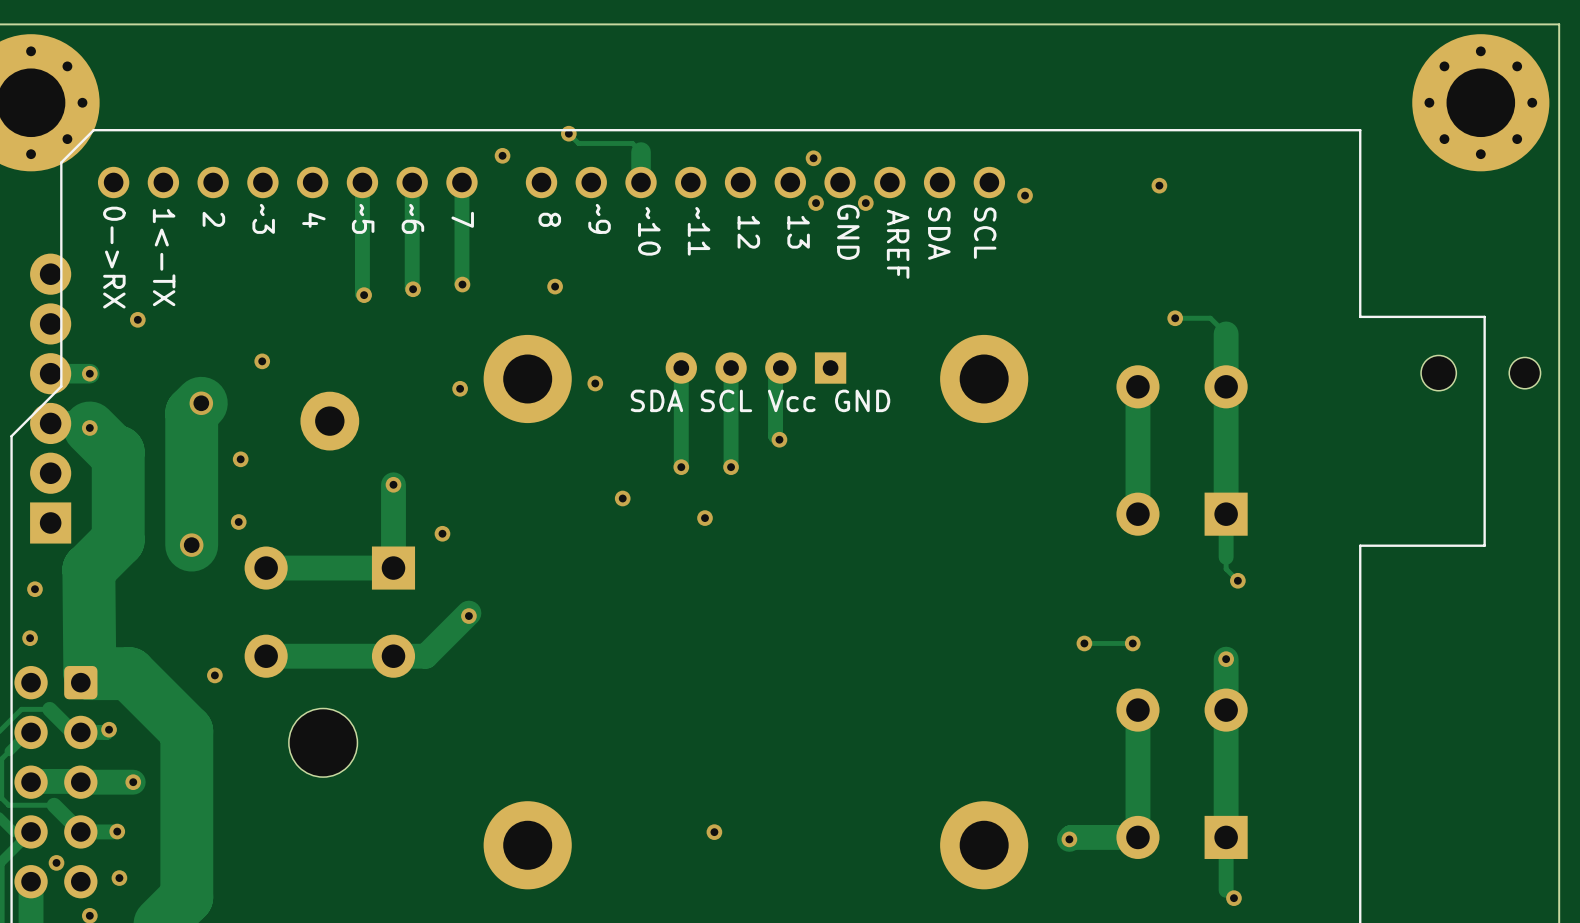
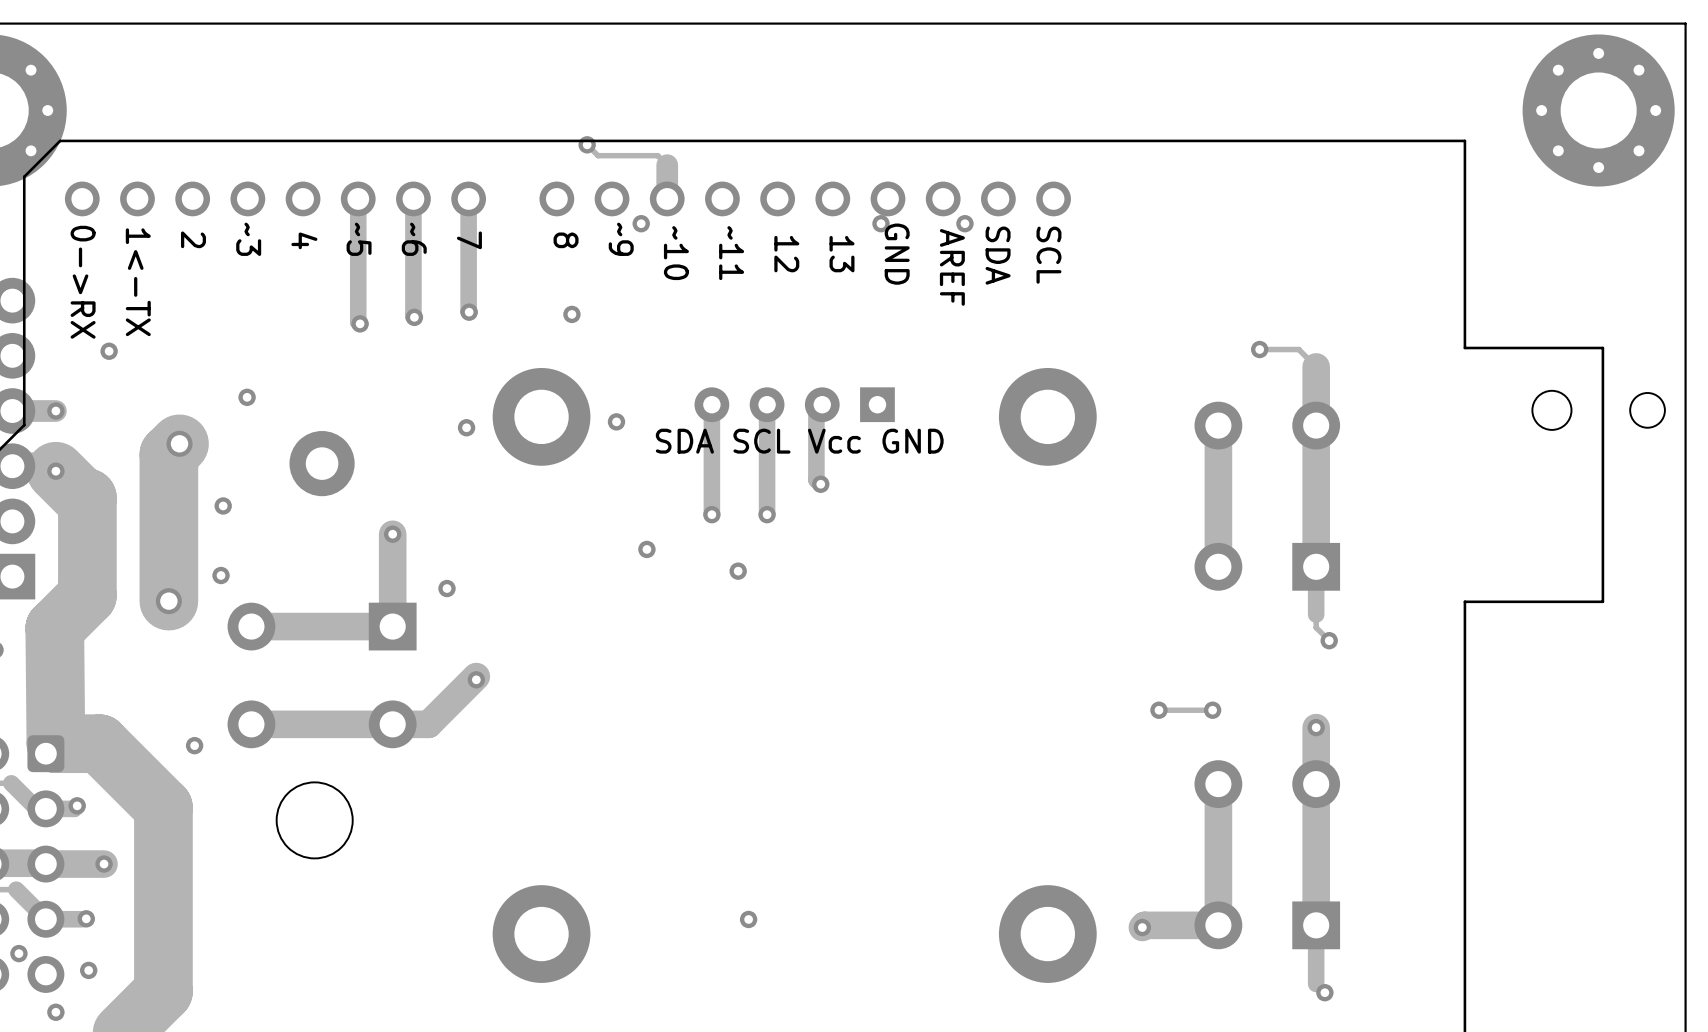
via: (502, 155) -> none
via: (813, 158) -> none
via: (1159, 185) -> none
via: (1025, 195) -> none
via: (816, 203) -> none
via: (865, 203) -> none
via: none -> (641, 223)
via: none -> (881, 223)
via: none -> (964, 223)

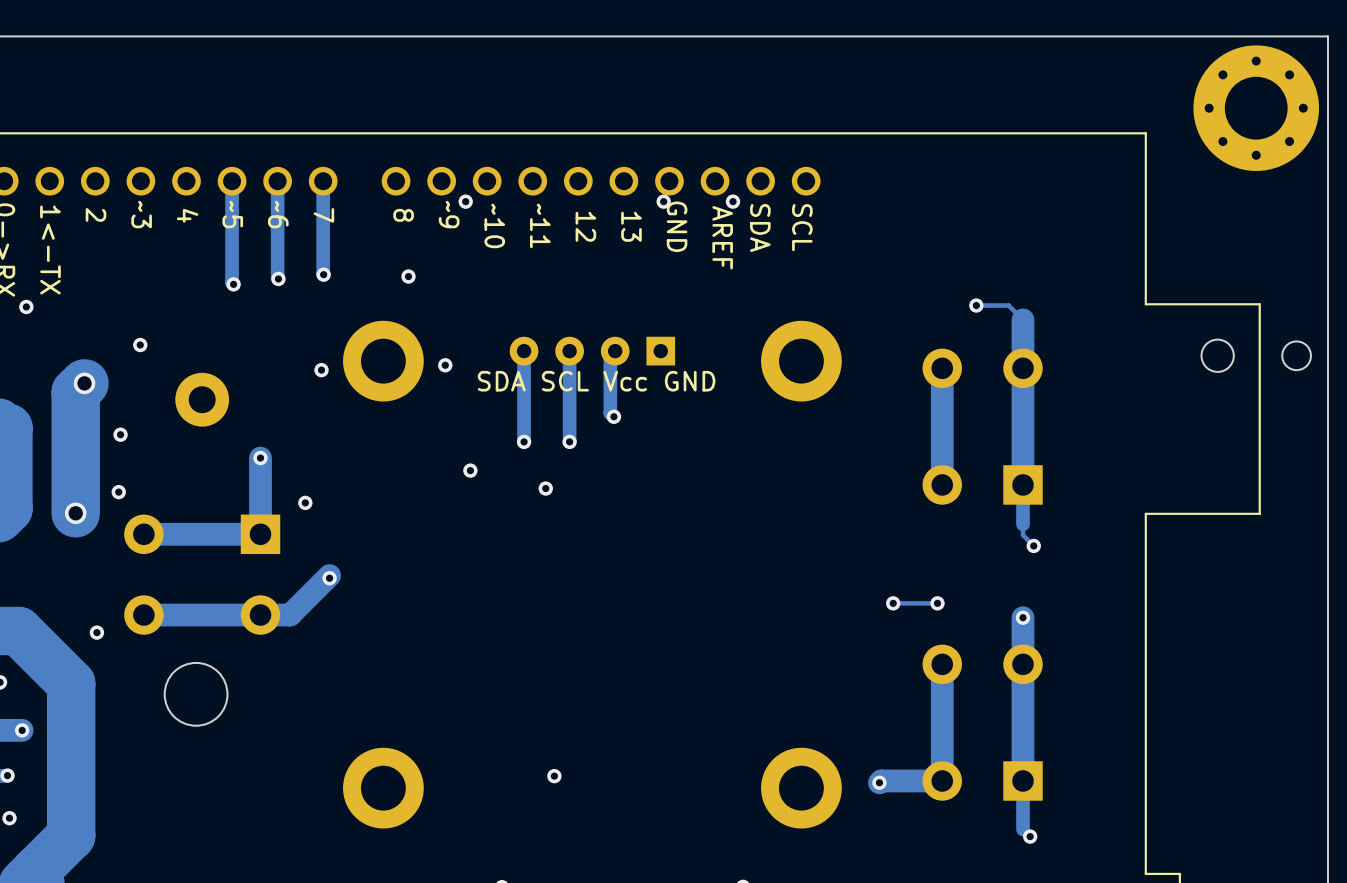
track: (587, 144) (598, 155) (657, 155) (667, 165) (667, 198) -> none
via: (587, 144) -> none

